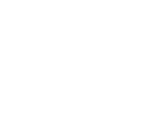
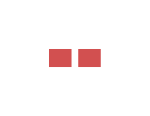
part: none -> (74, 58)

